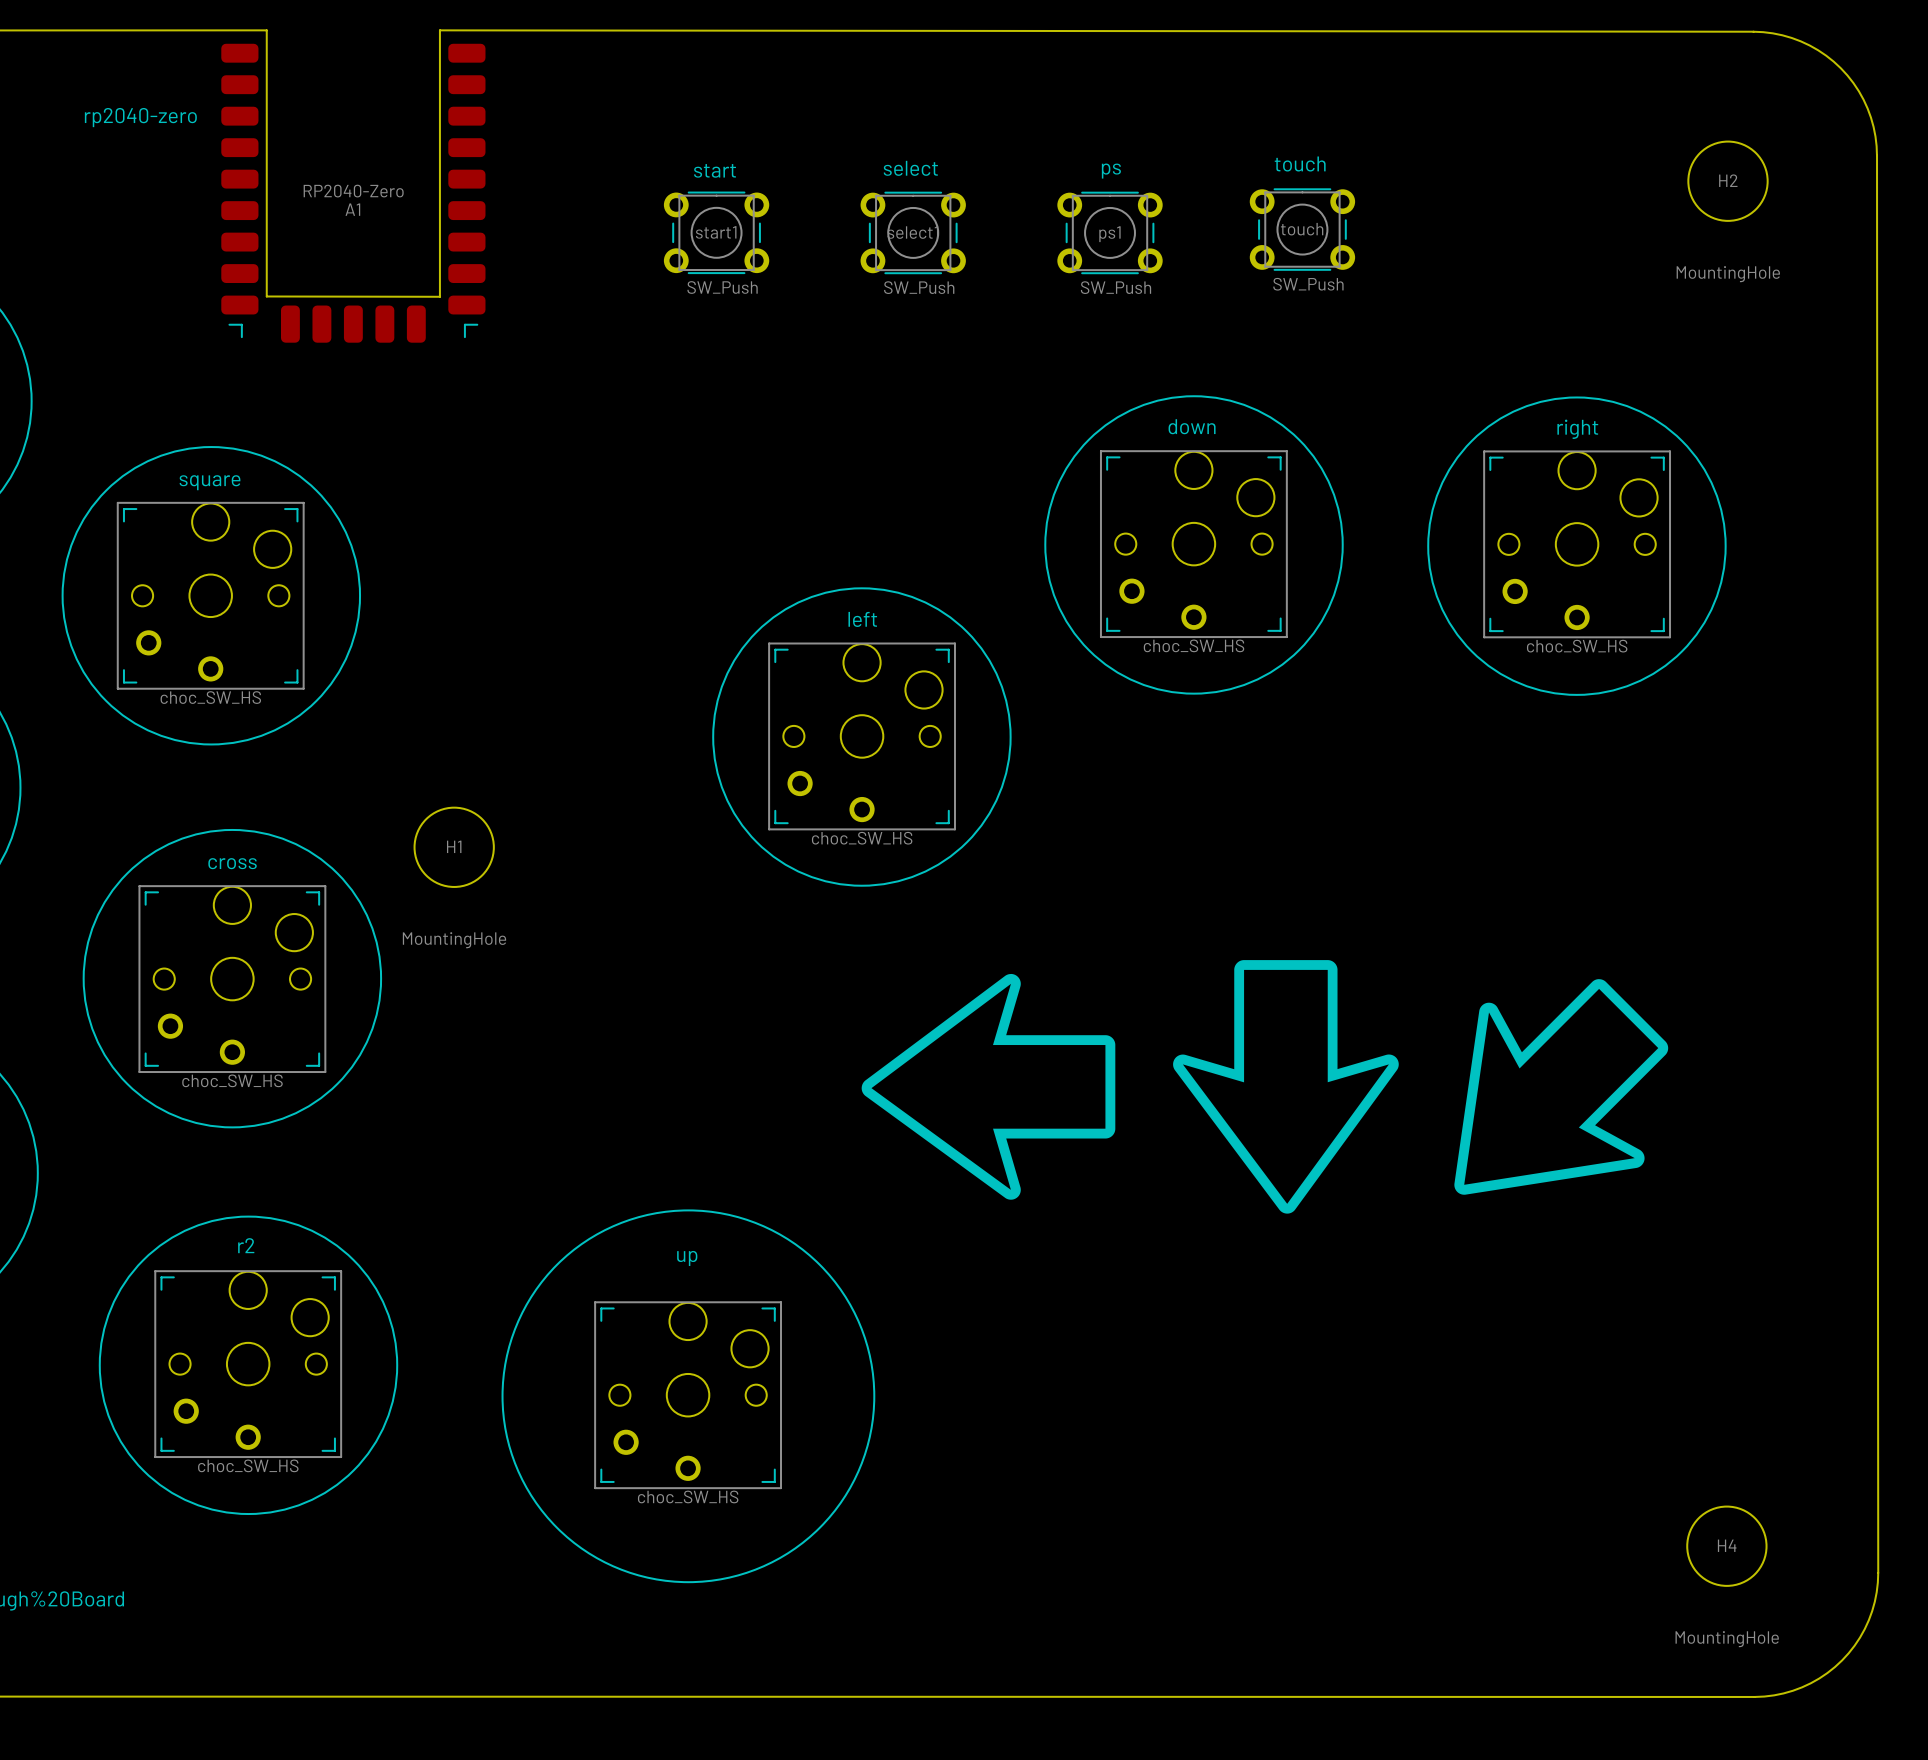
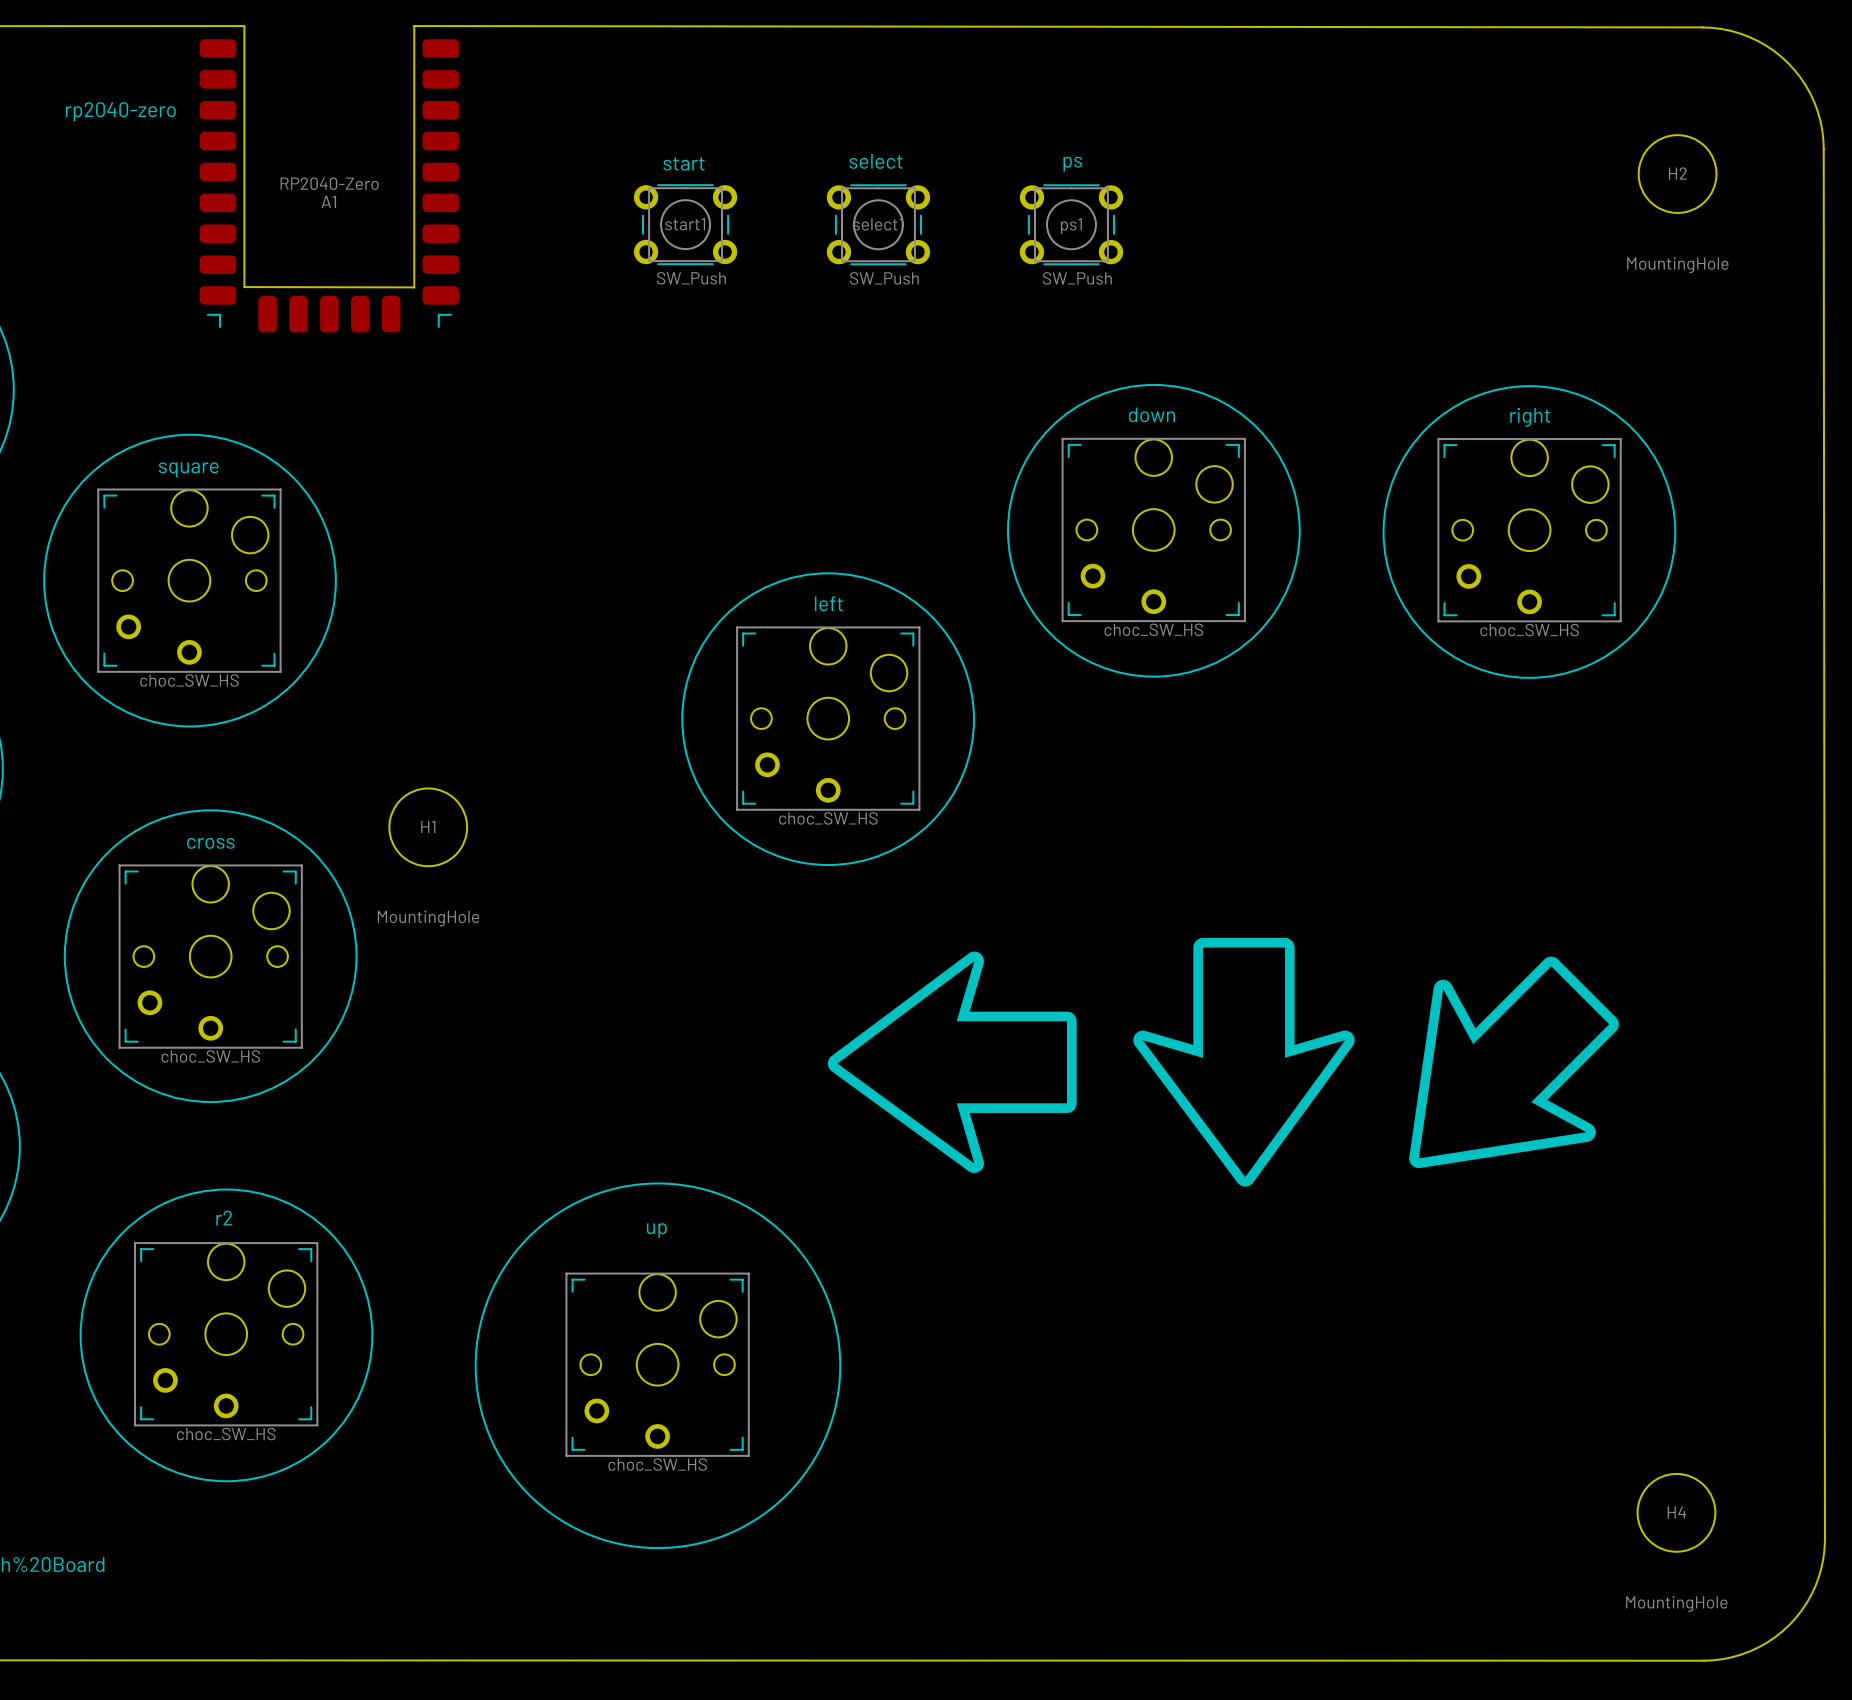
text: touch (1300, 164) -> none
touch: SW_Push (1302, 229) -> none

